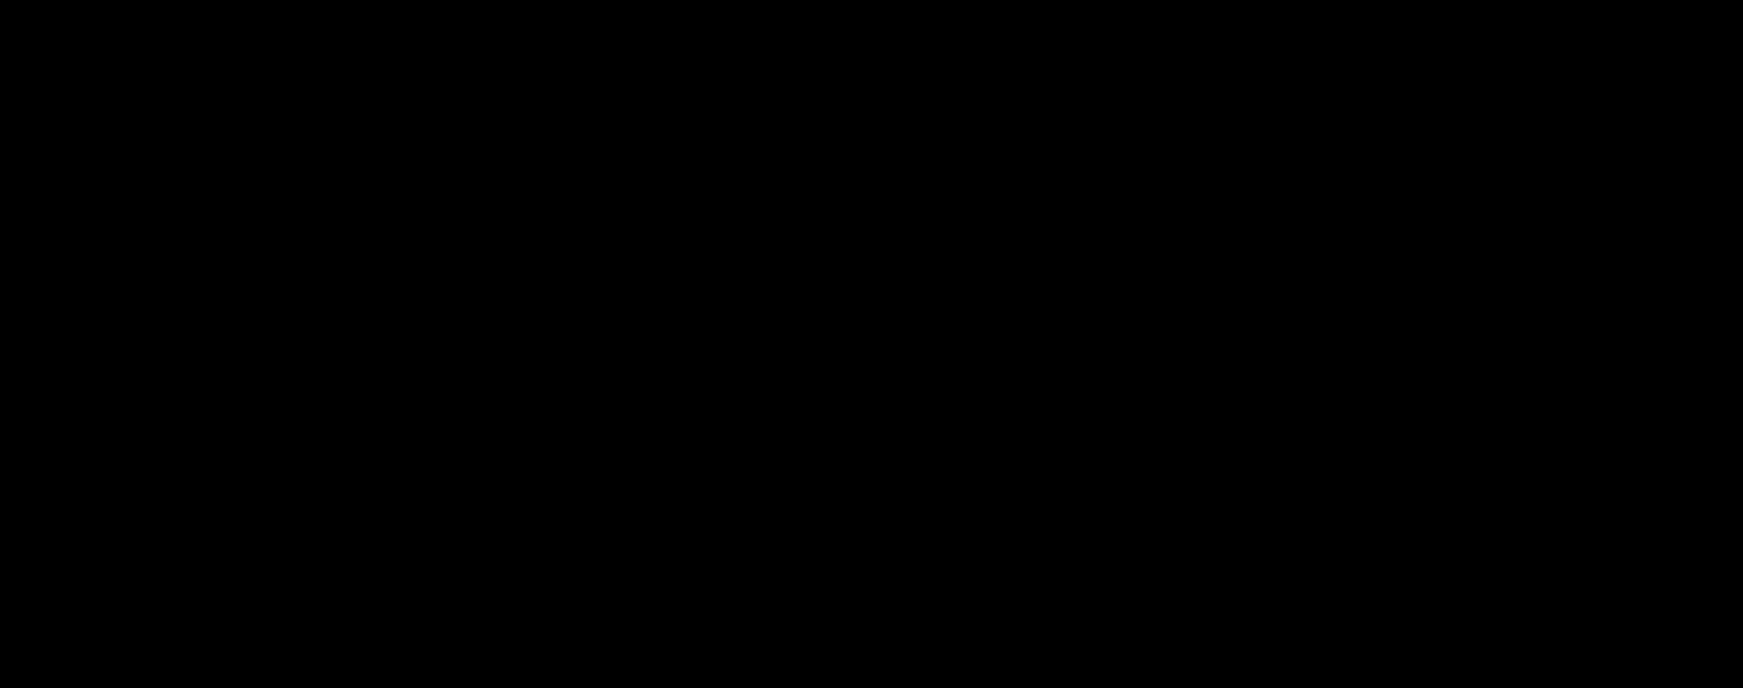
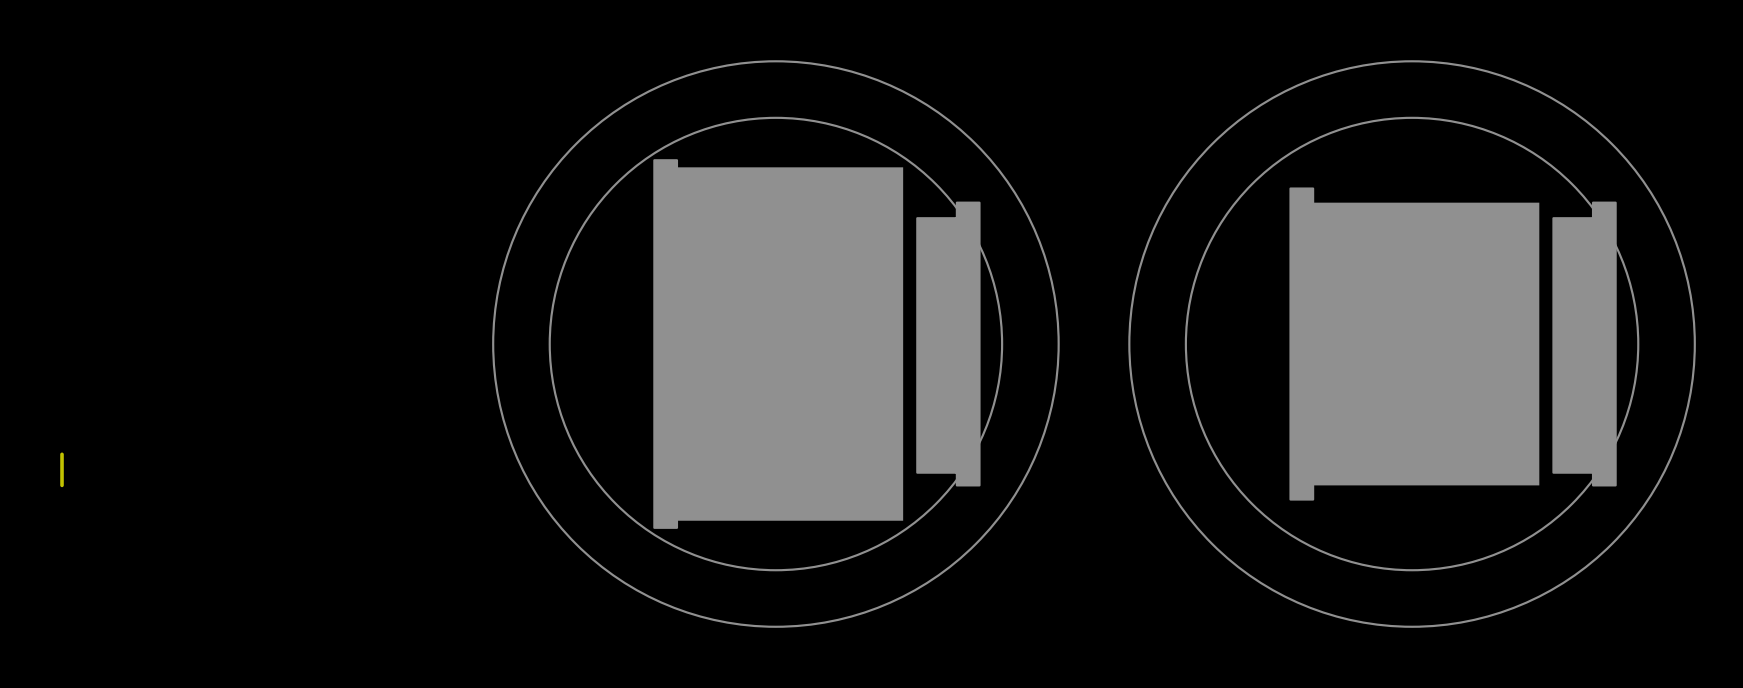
drawing: none -> [492, 60, 1060, 628]
drawing: none -> [1128, 60, 1696, 628]
board edge: none -> (62, 454) (62, 485)

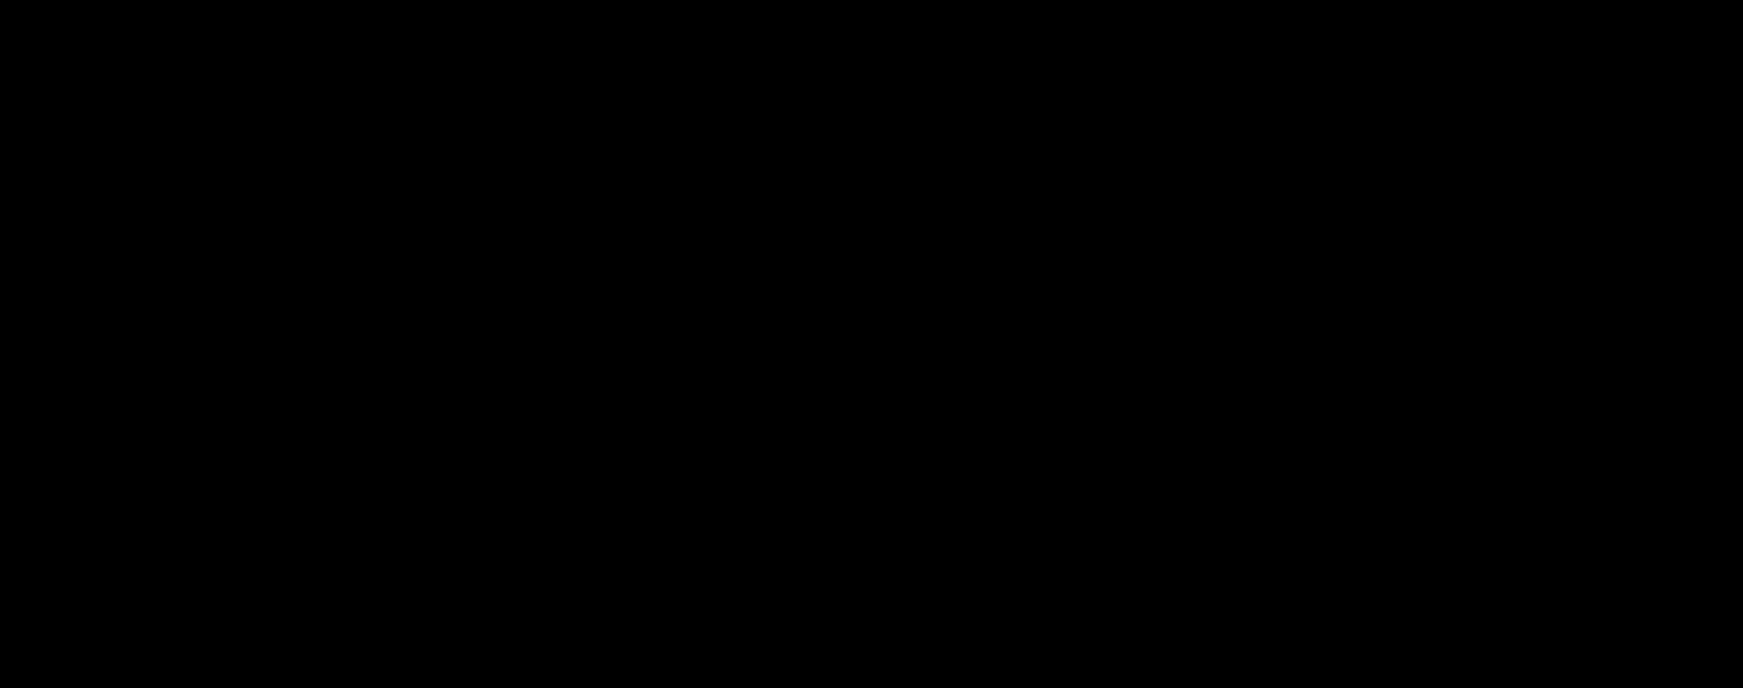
drawing: [492, 60, 1060, 628] -> none
drawing: [1128, 60, 1696, 628] -> none
board edge: (62, 454) (62, 485) -> none

